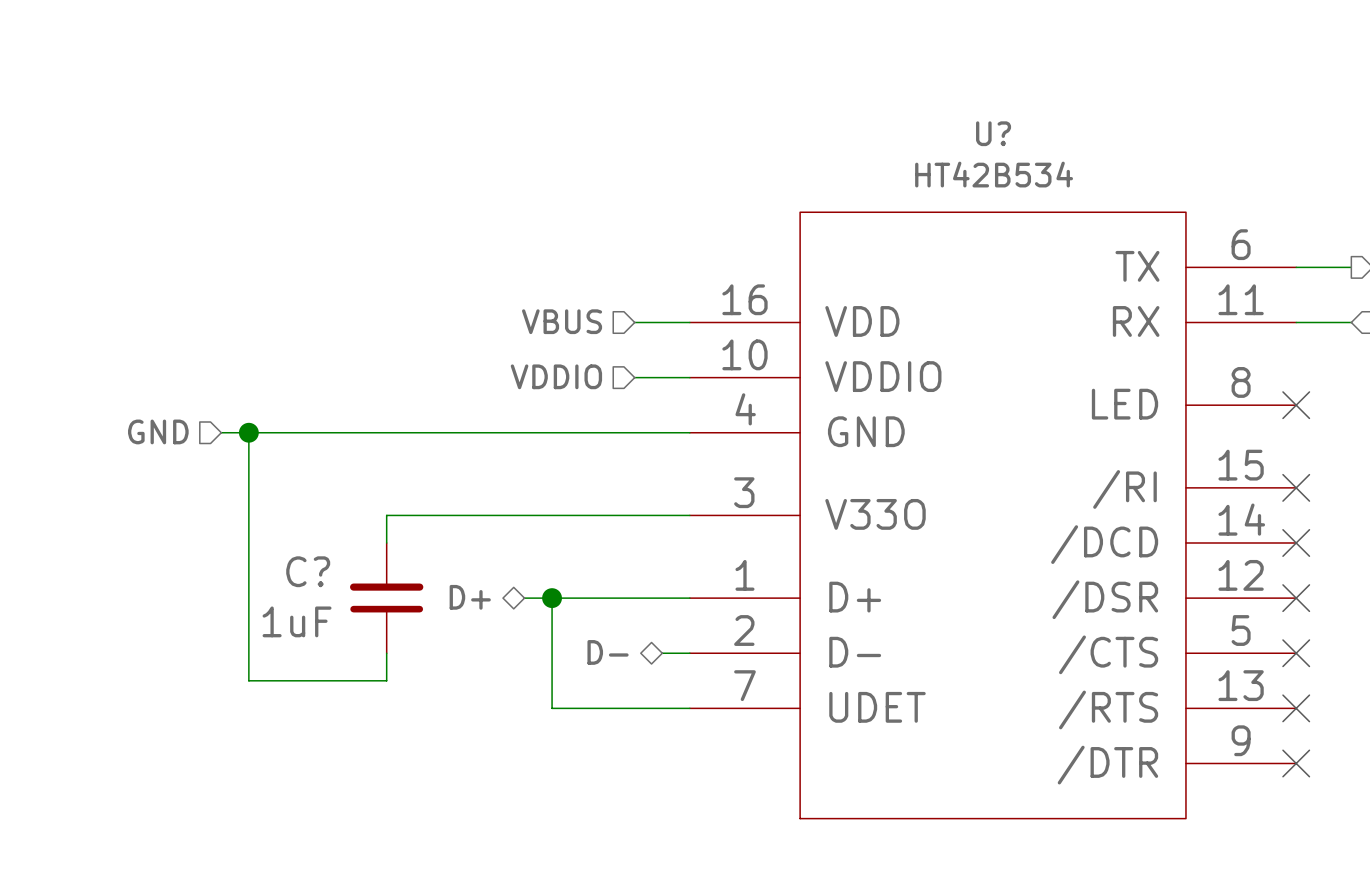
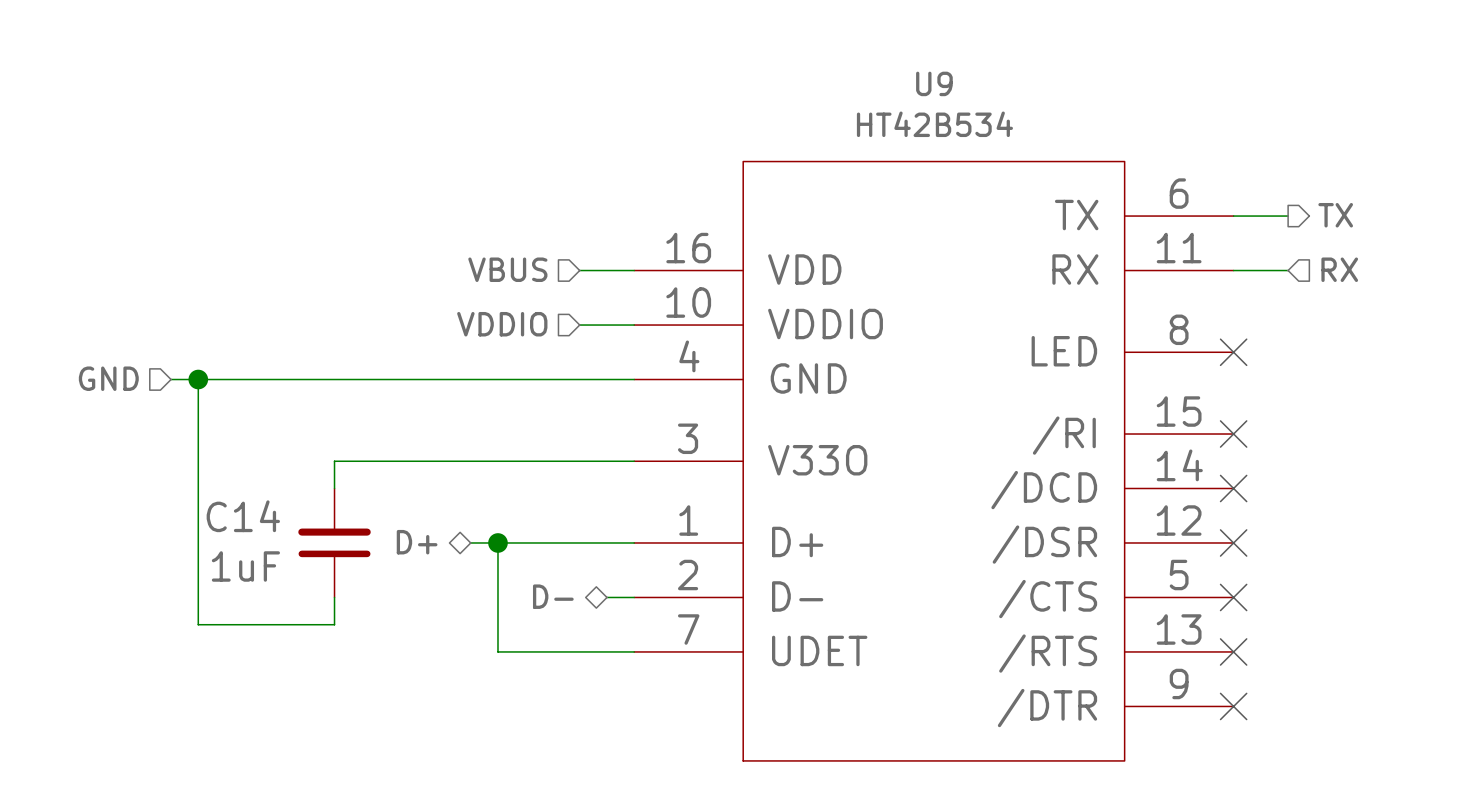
U? name: U? (993, 133) -> U9 (934, 83)
C? name: C? (308, 571) -> C14 (243, 516)

